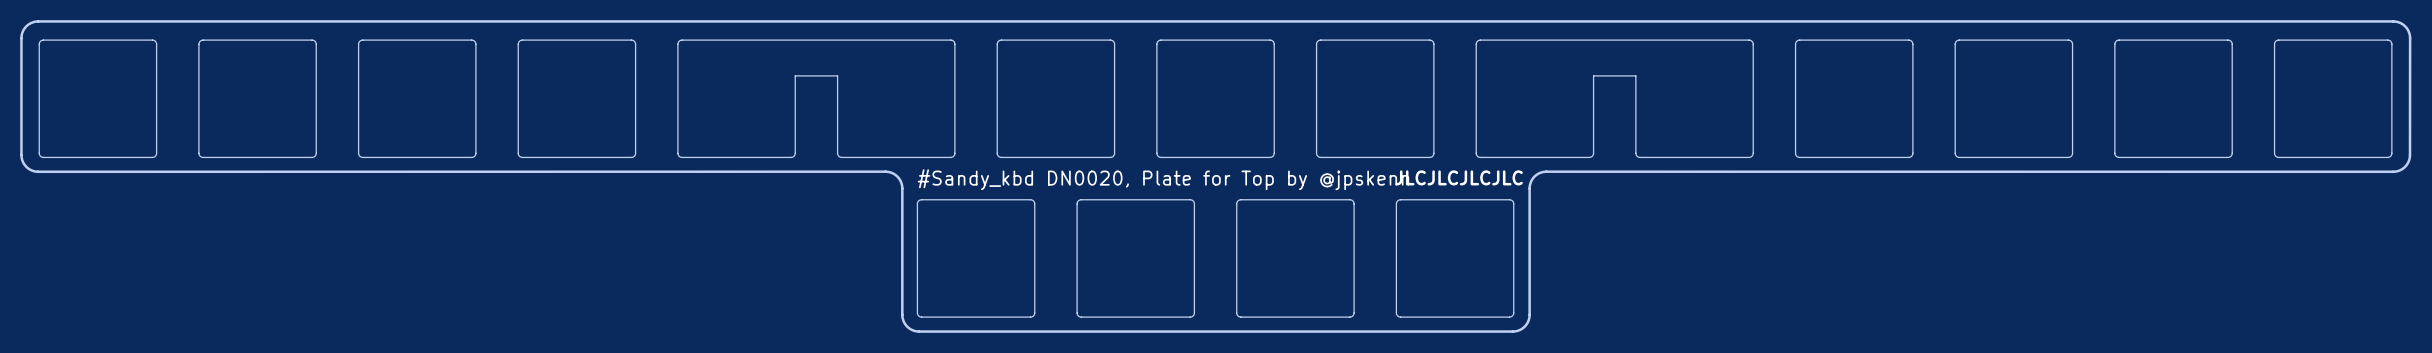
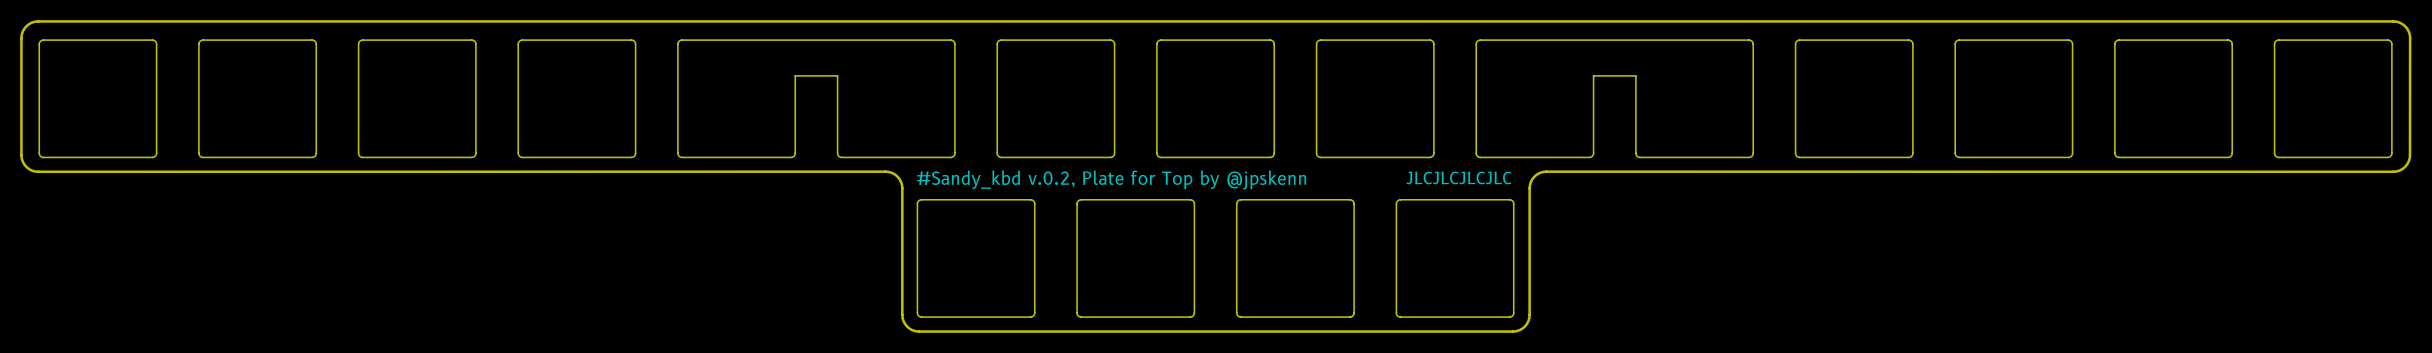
text: #Sandy_kbd DN0020, Plate for Top by @jpskenn (1163, 179) -> #Sandy_kbd v.0.2, Plate for Top by @jpskenn (1111, 179)

